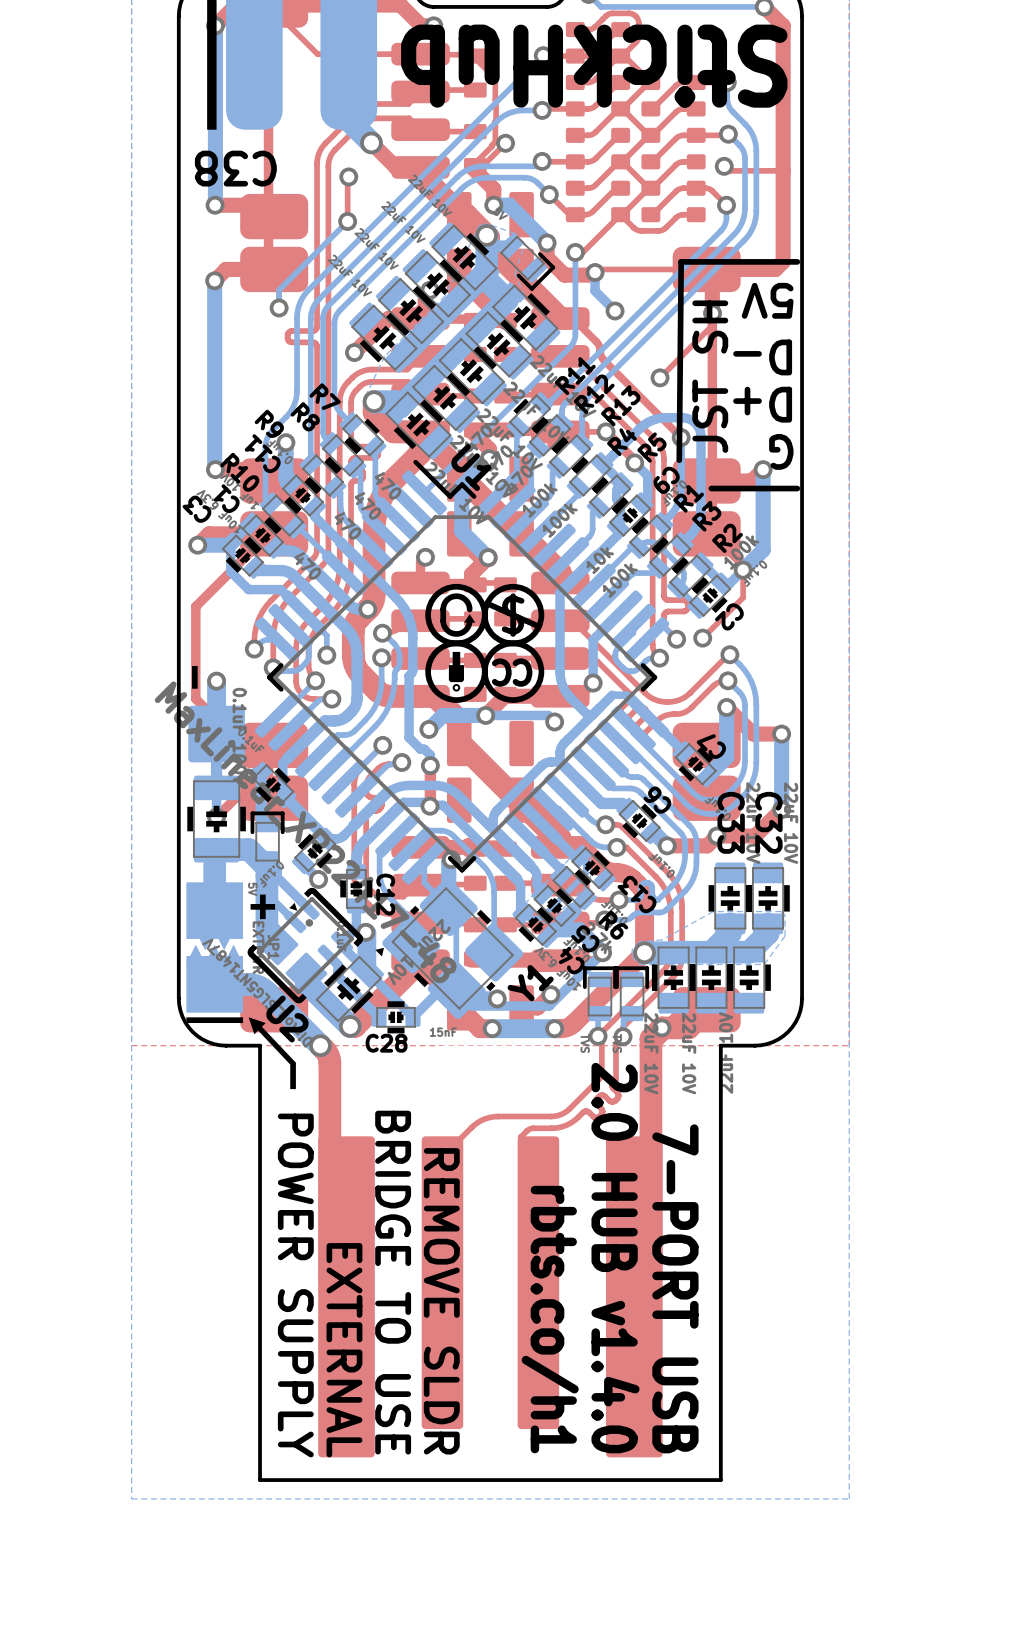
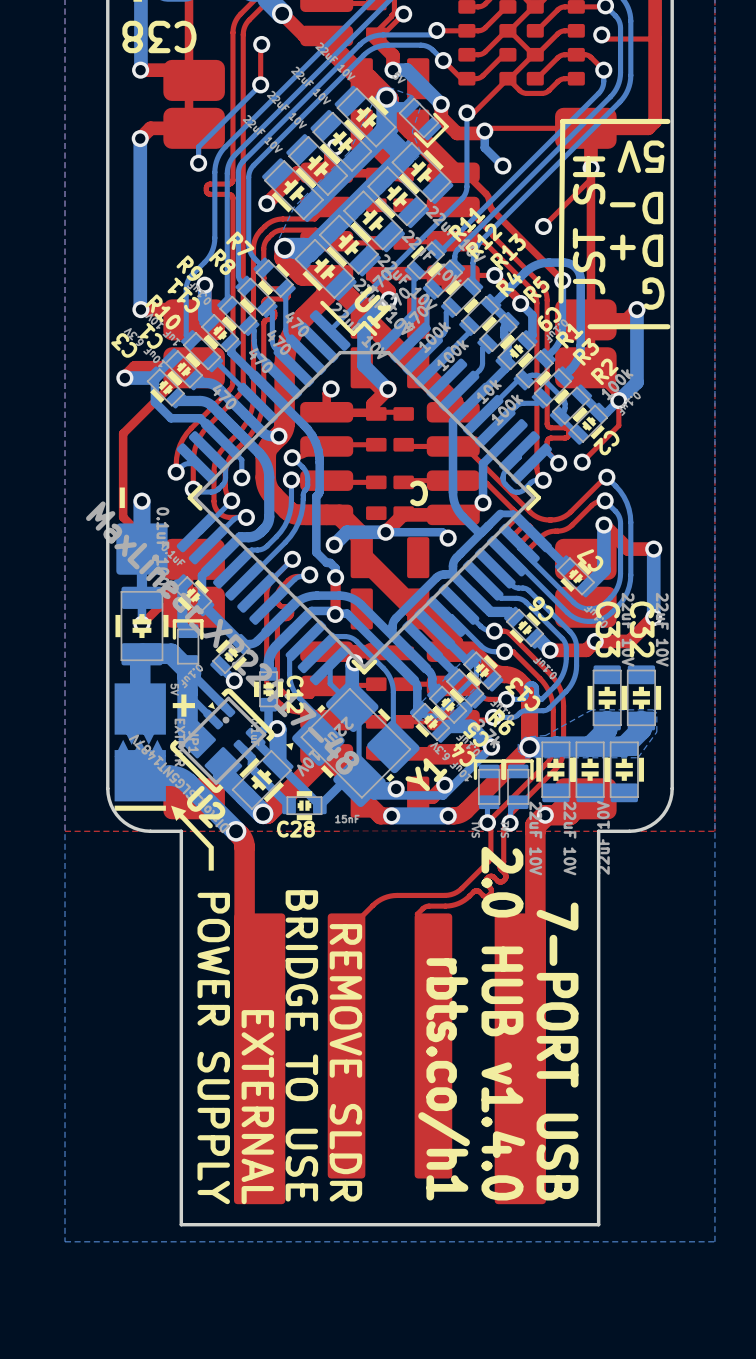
drawing: [425, 583, 545, 703] -> none
drawing shape: [481, 640, 545, 703] -> [410, 480, 428, 507]

